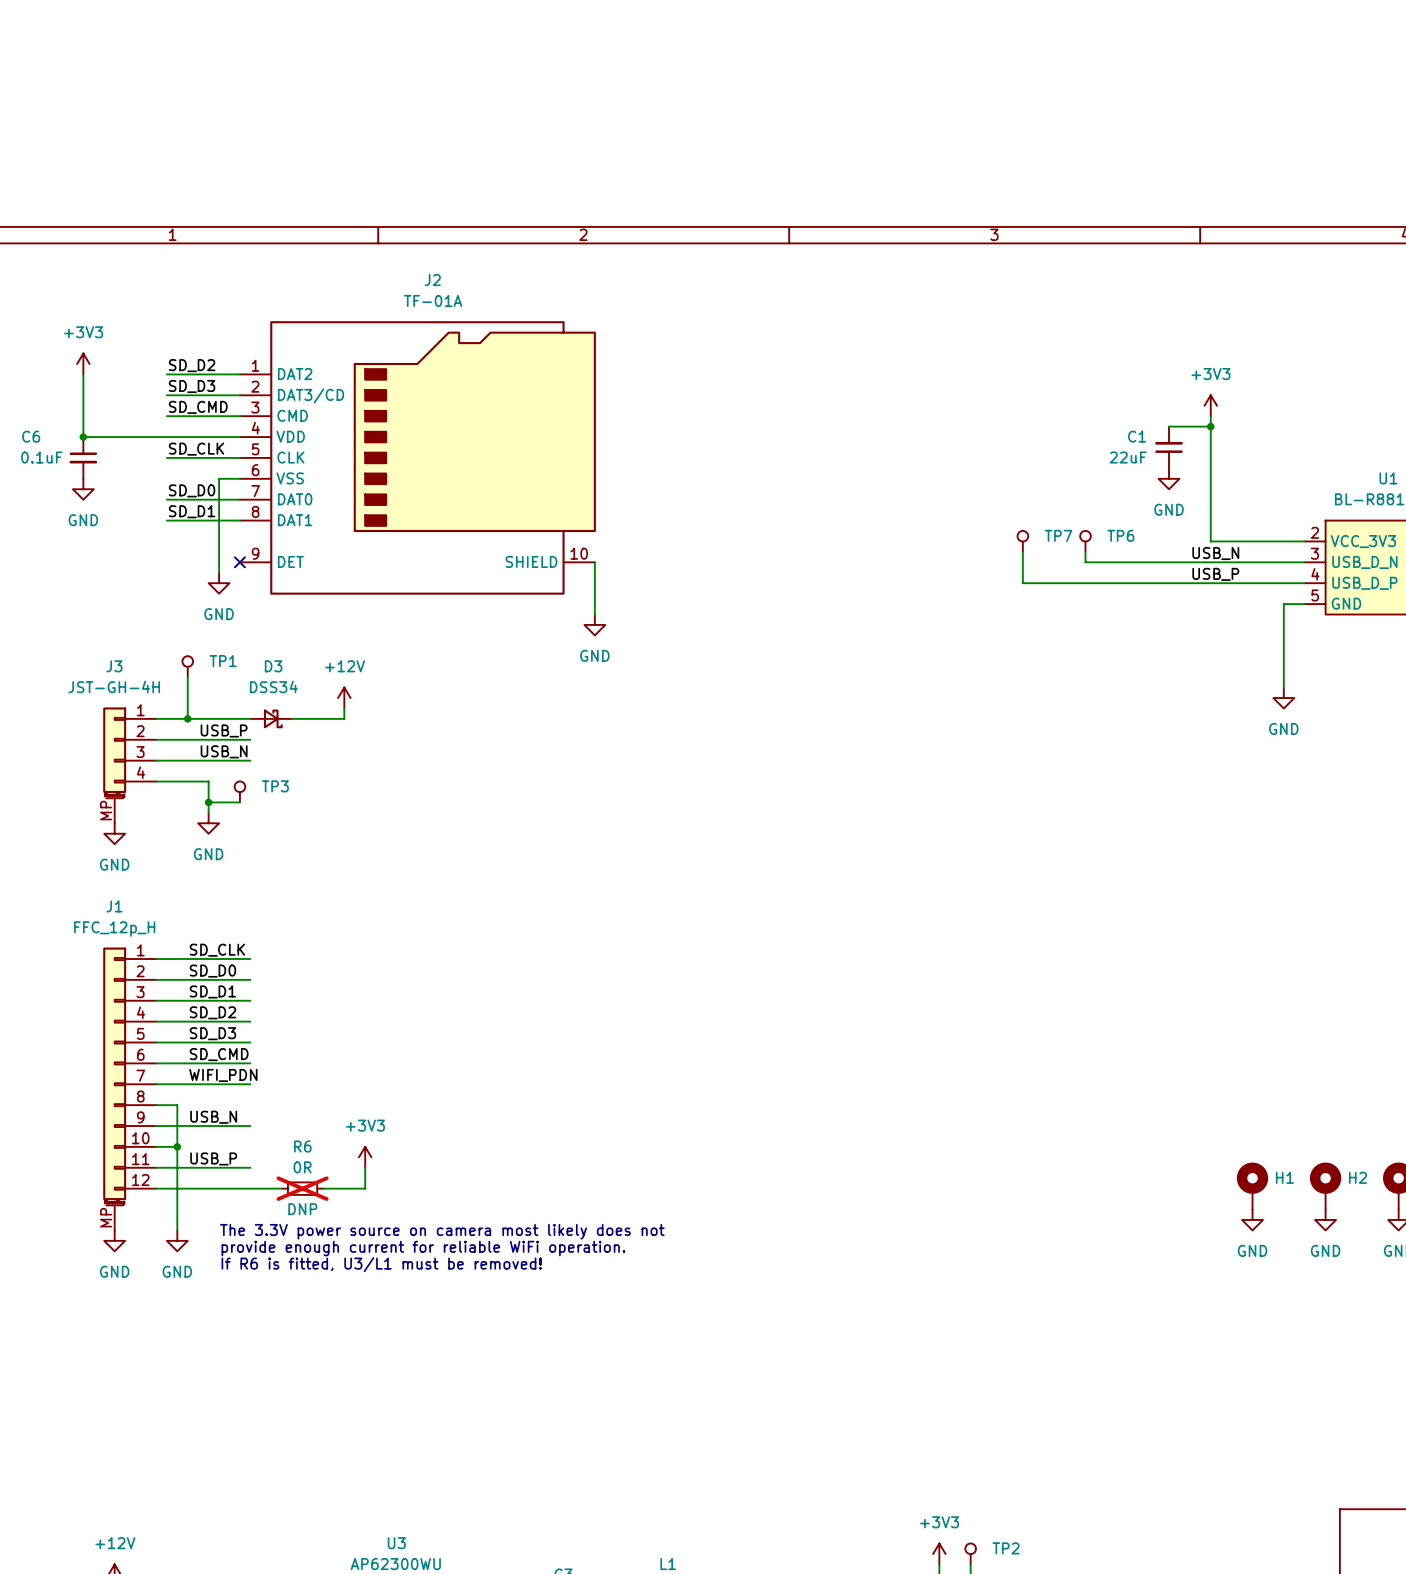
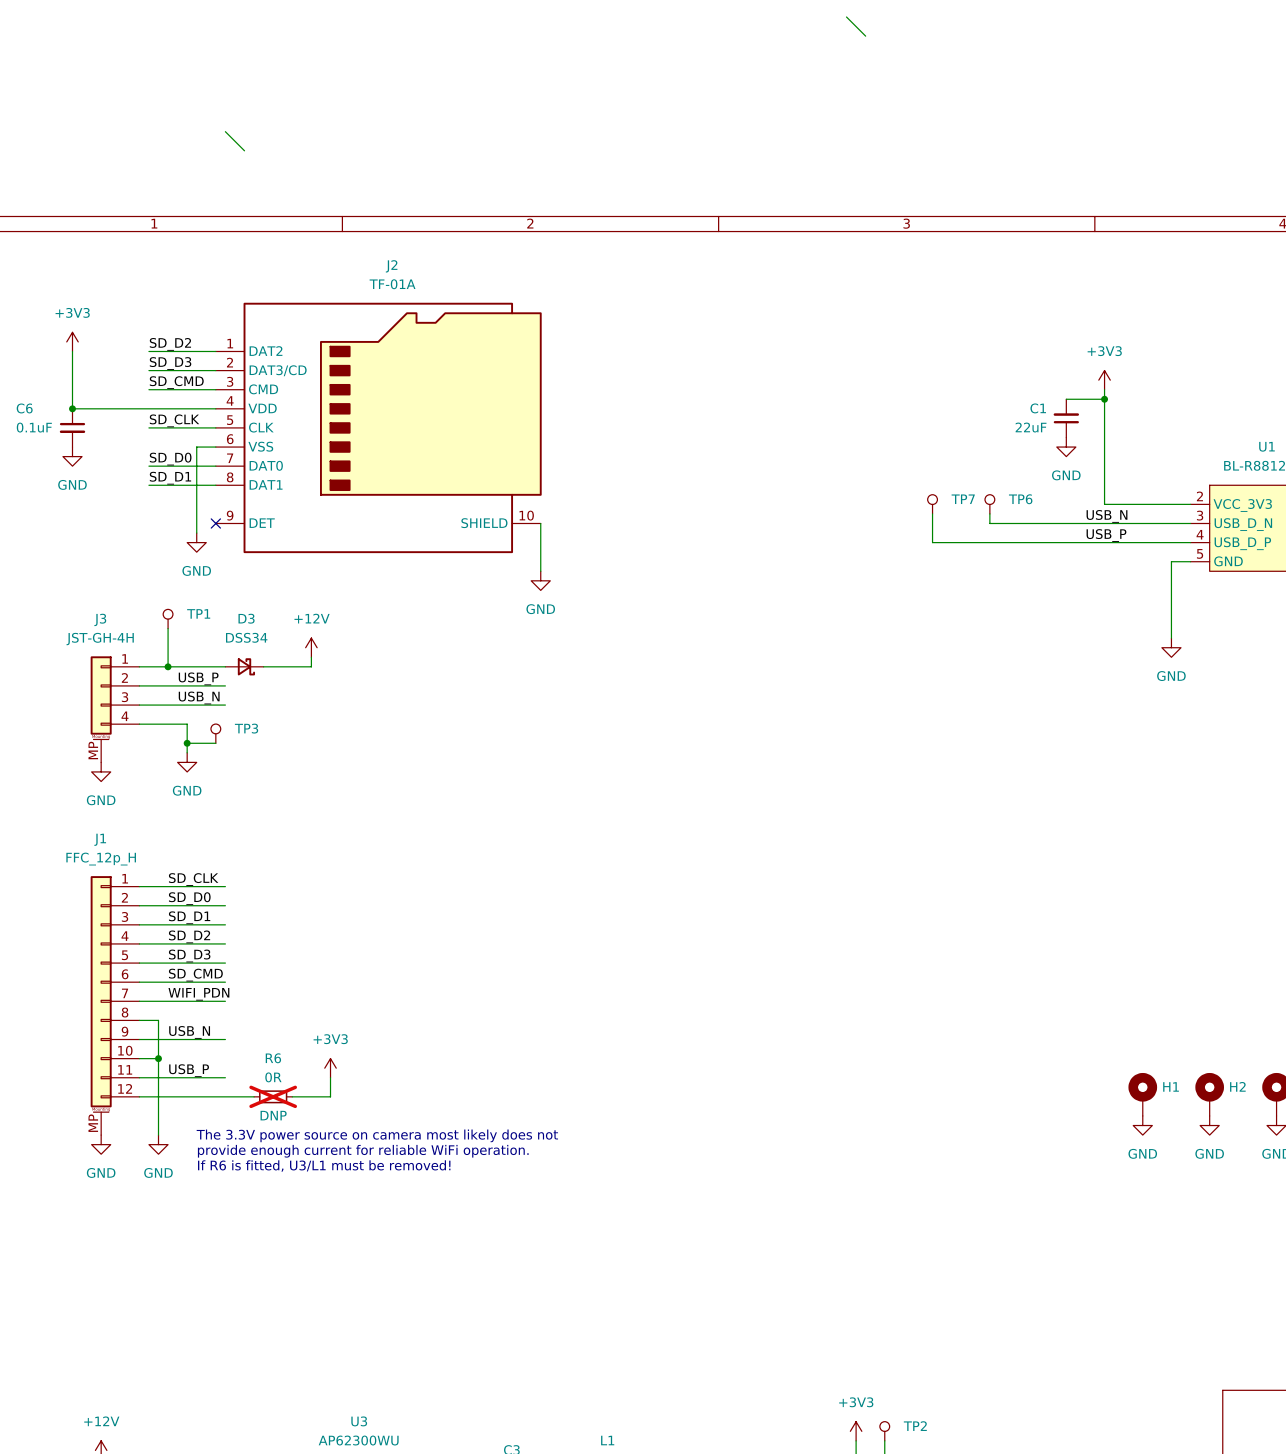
wire: none -> (846, 17) (865, 36)
wire: none -> (225, 131) (244, 150)

